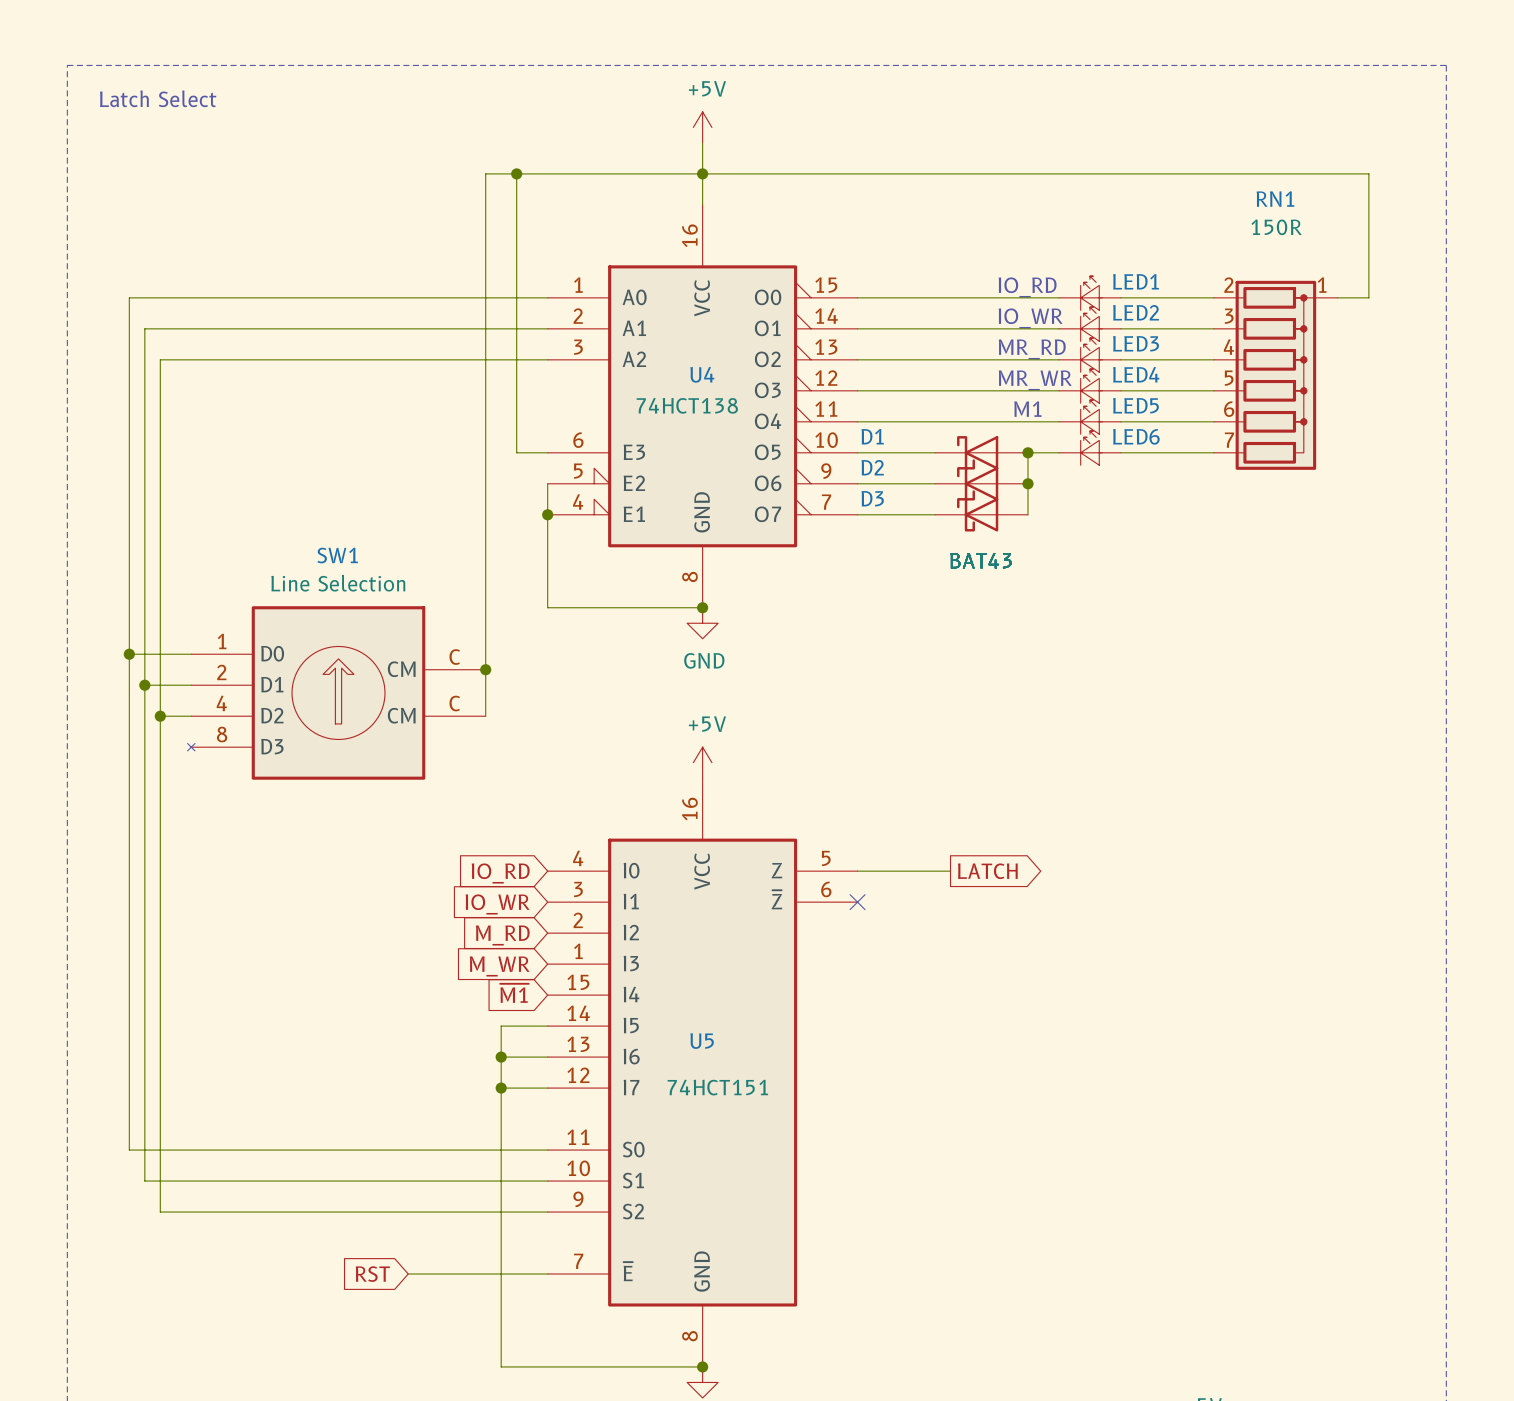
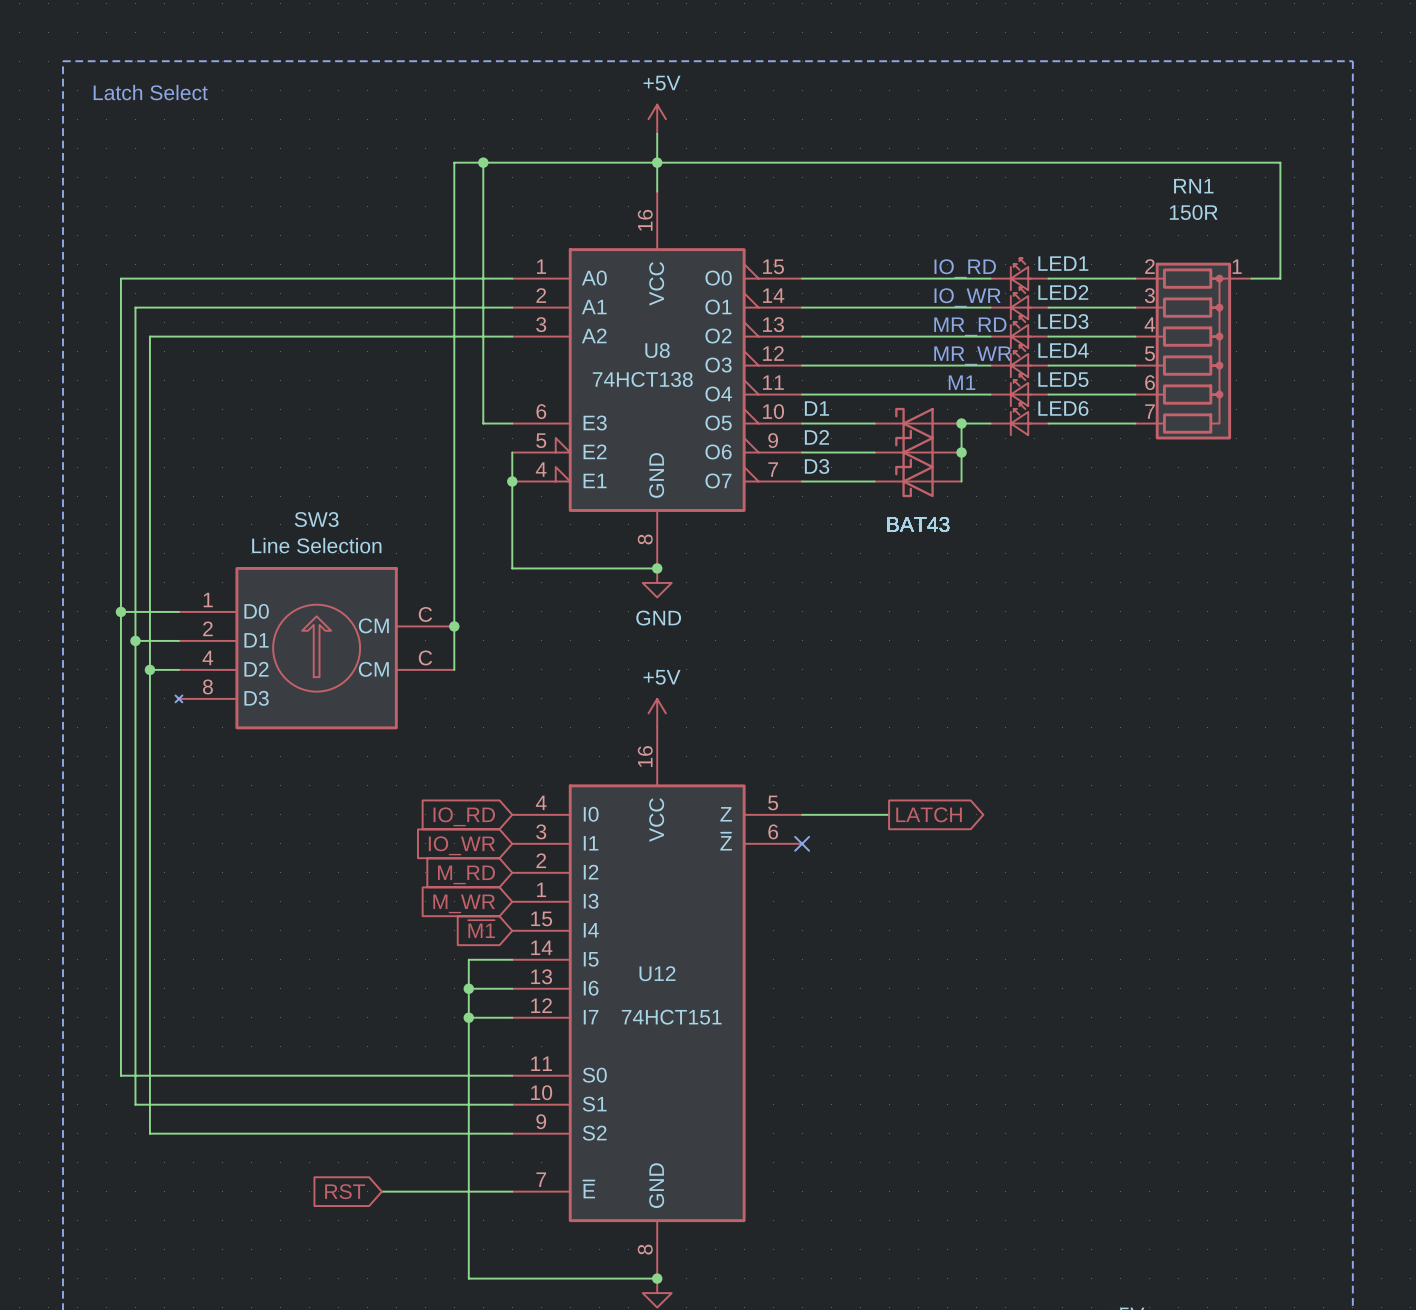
U4 name: U4 (702, 374) -> U8 (657, 350)
SW1 name: SW1 (337, 555) -> SW3 (316, 519)
U5 name: U5 (702, 1041) -> U12 (657, 973)

